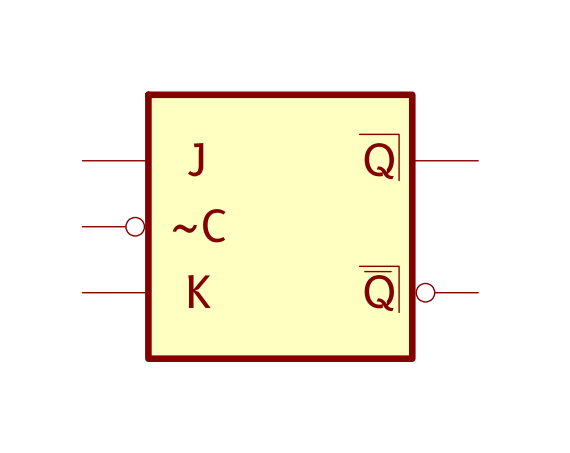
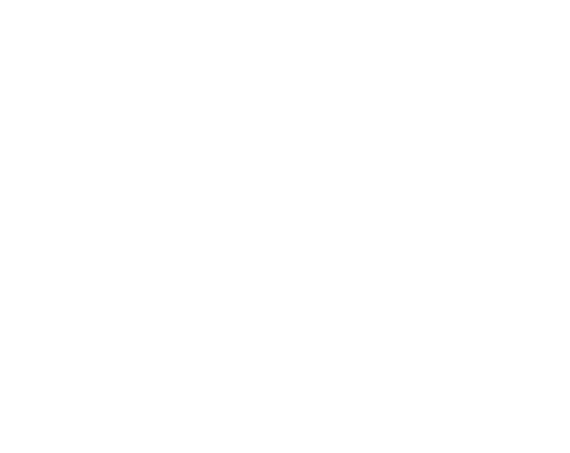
part: (280, 226) -> none

